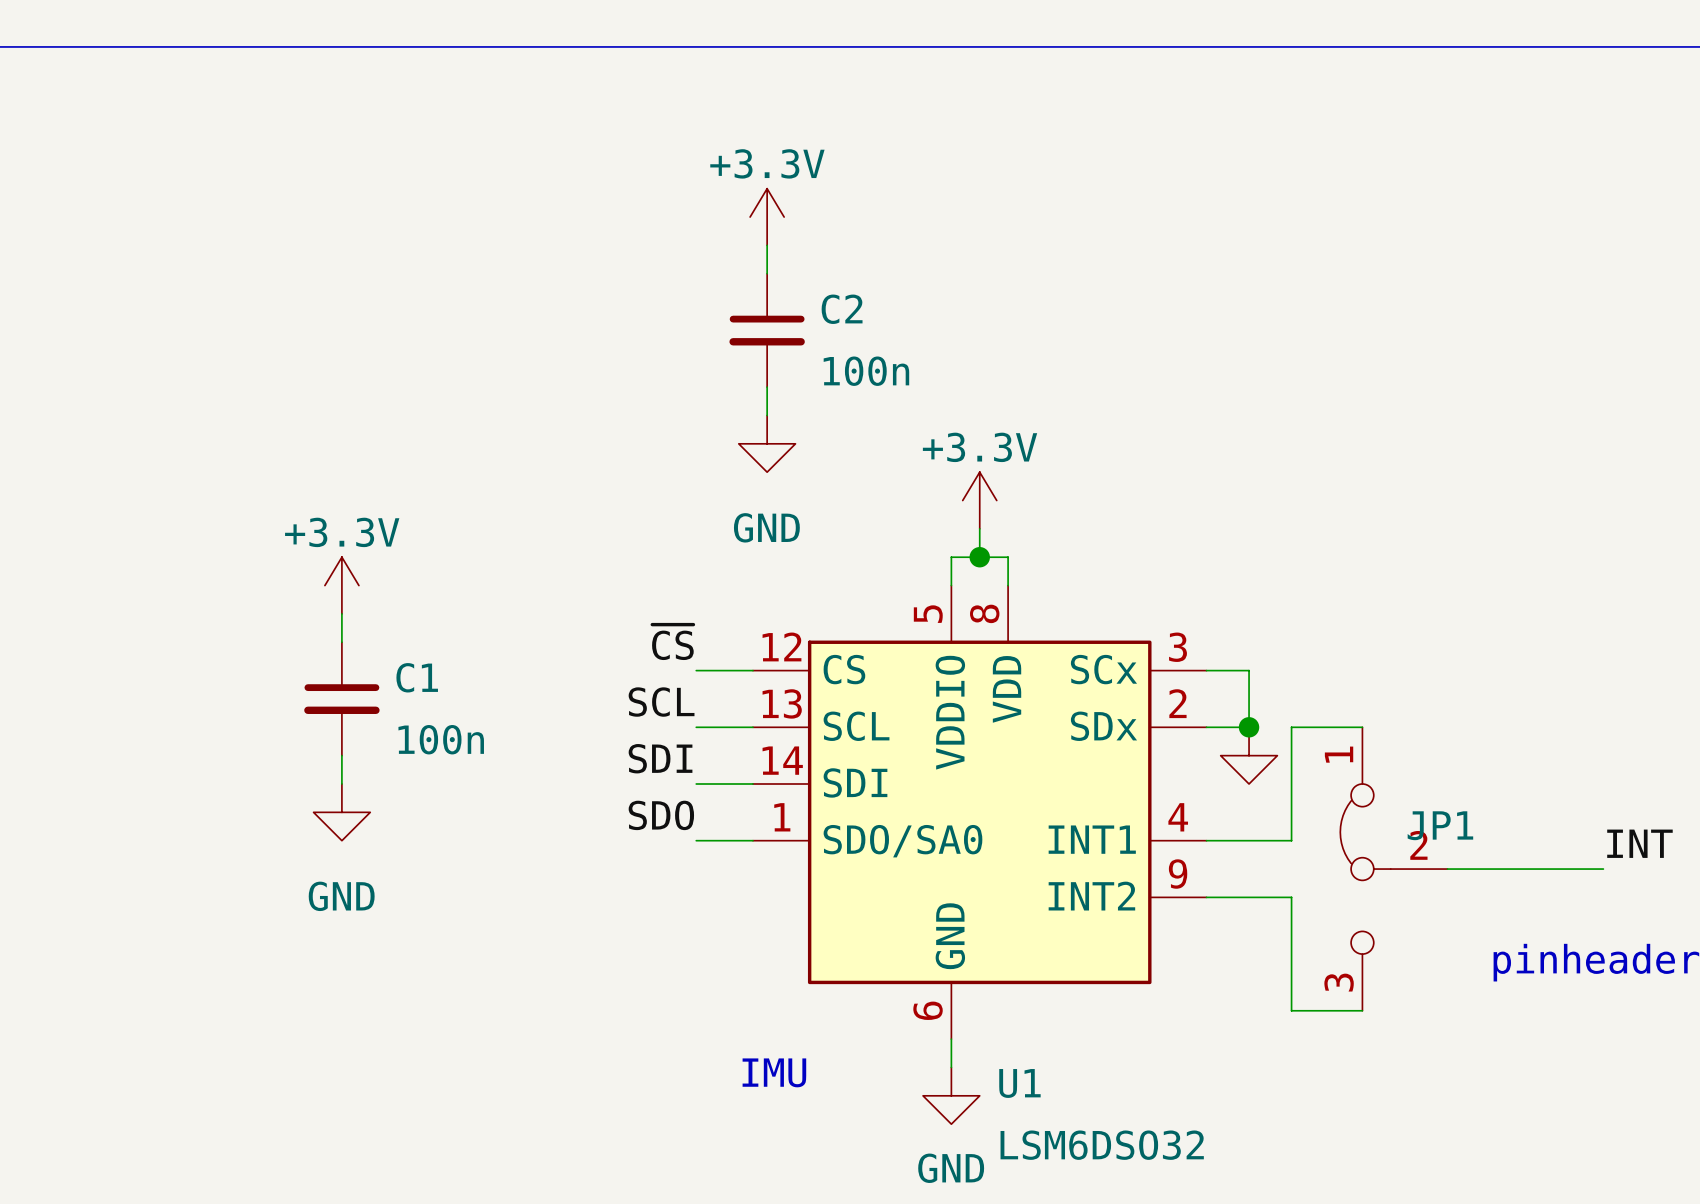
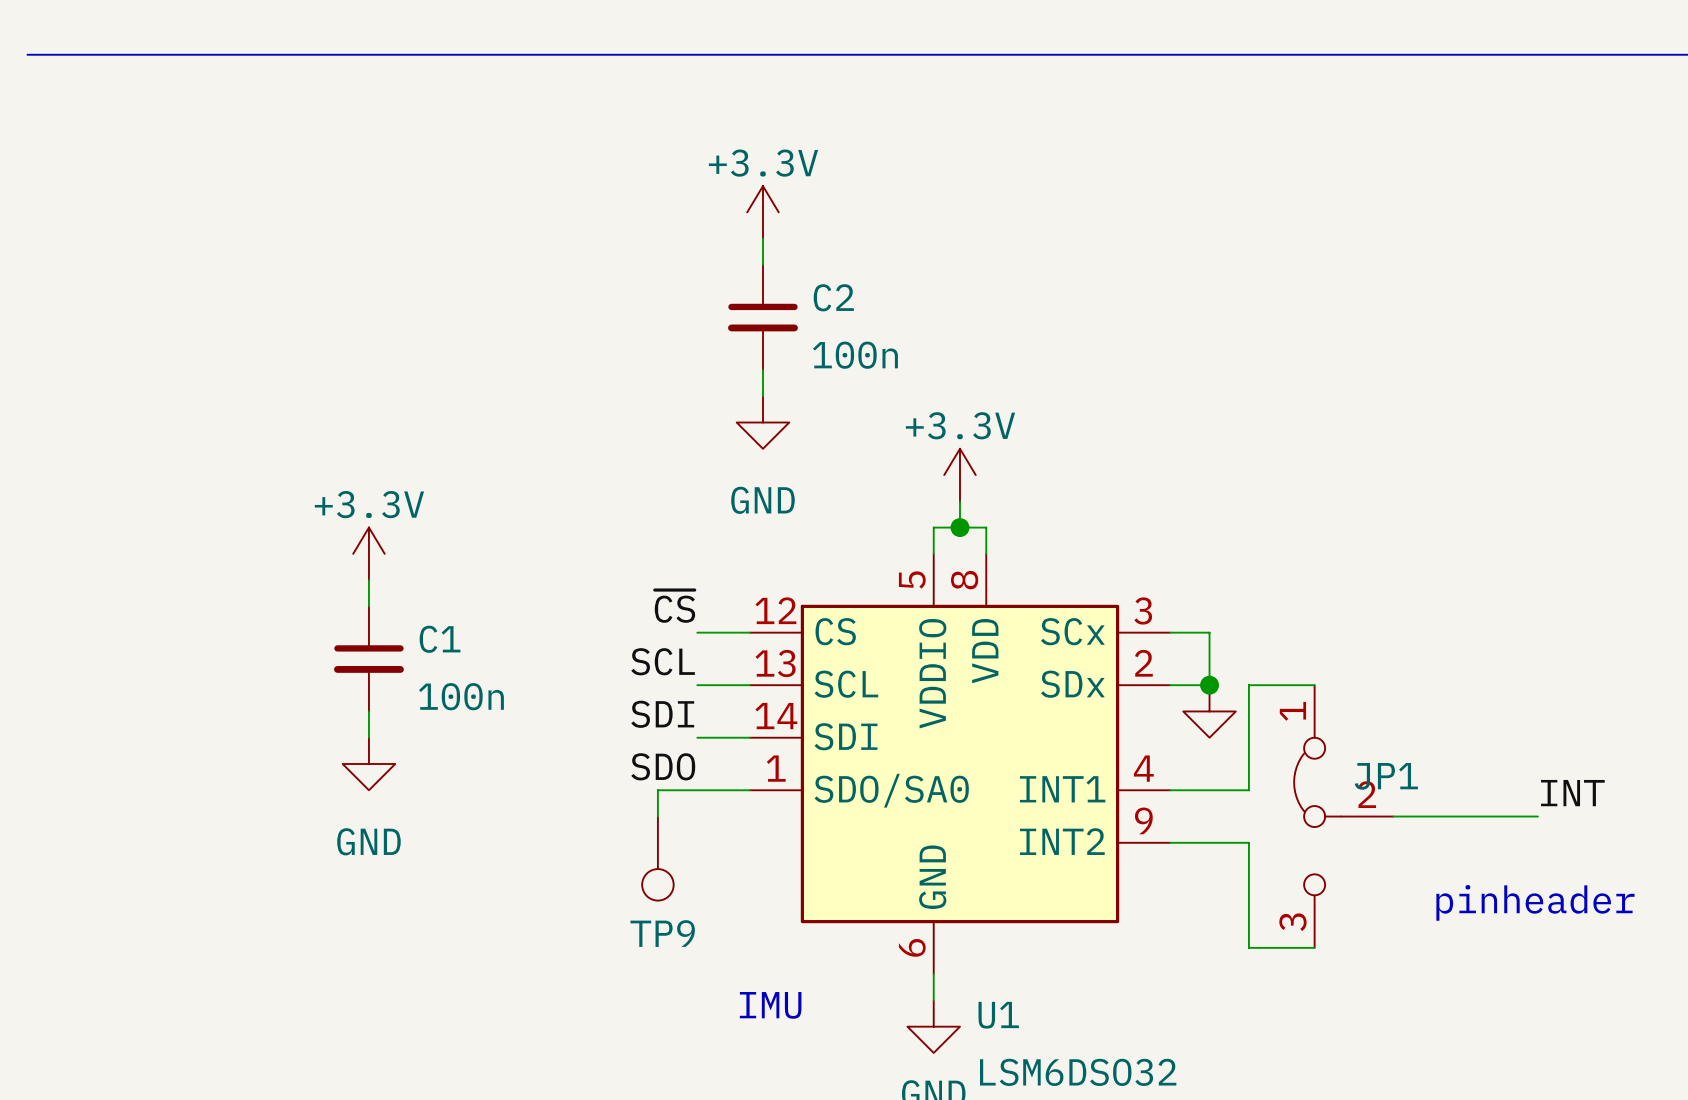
wire: none -> (697, 790) (657, 790) (657, 816)
TP9: none -> (657, 858)

